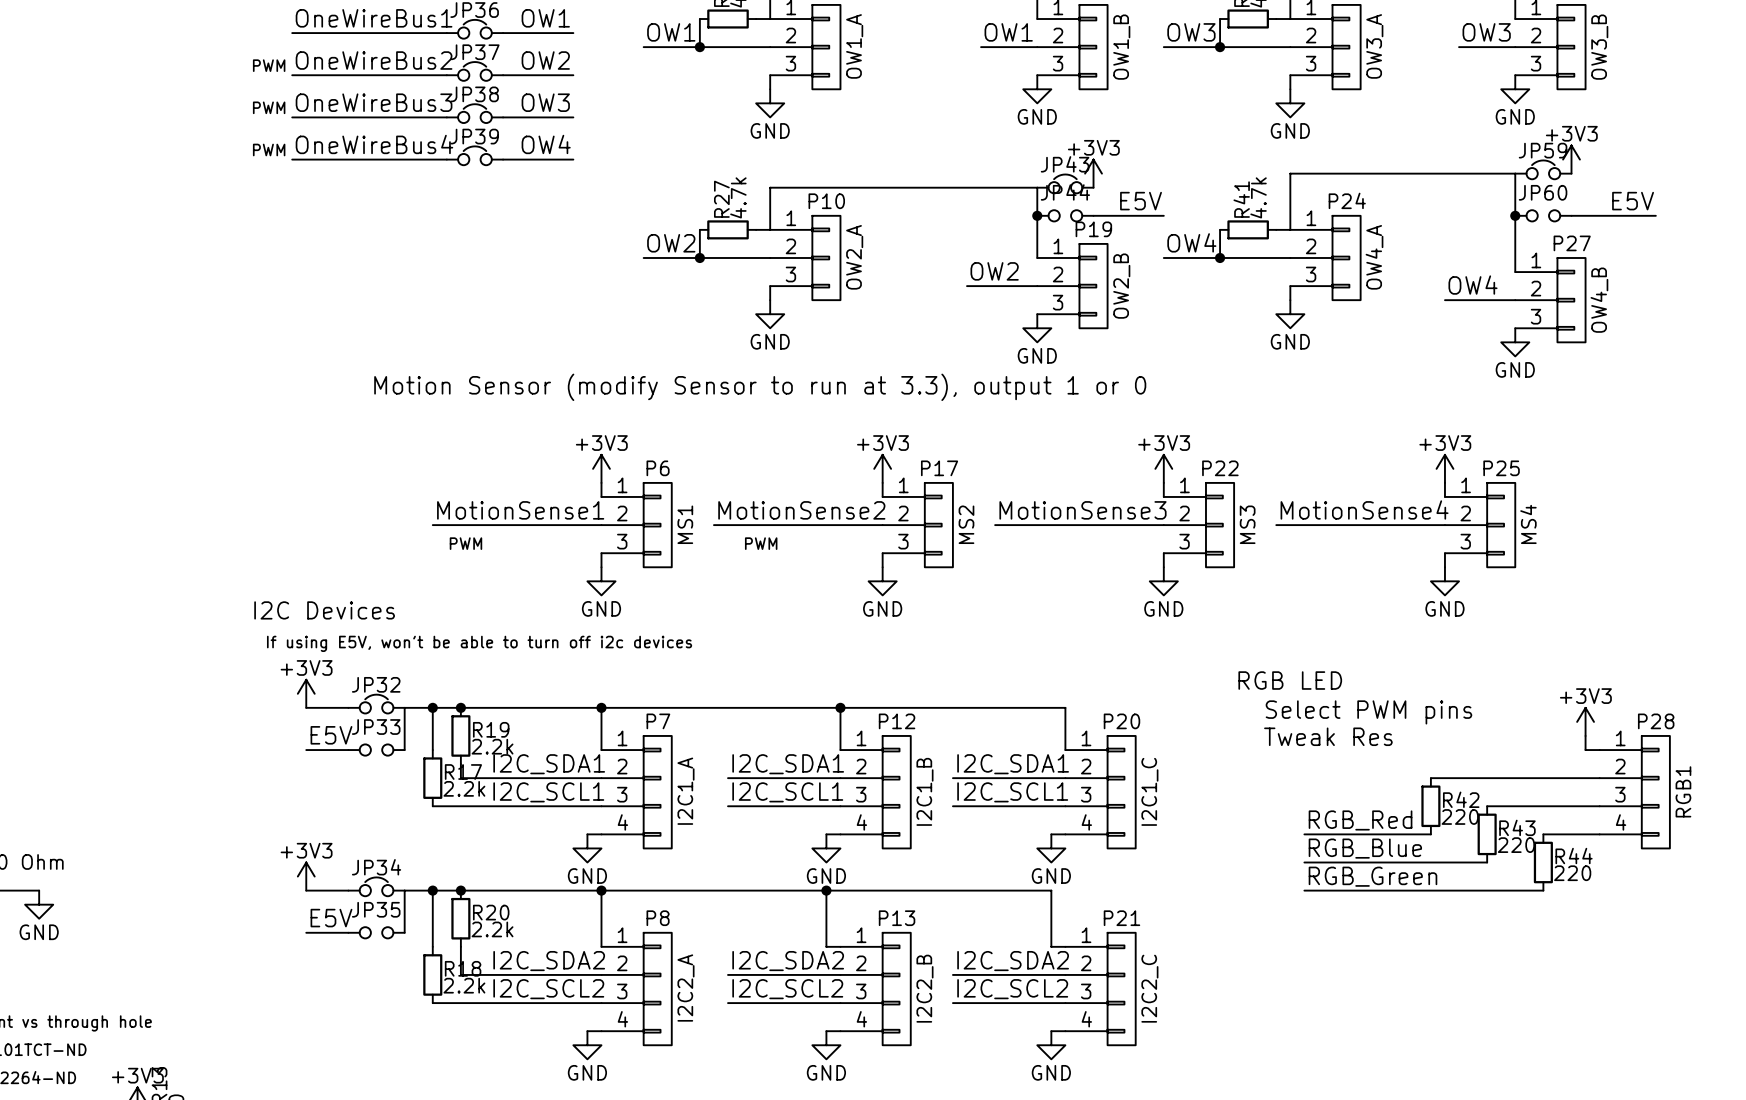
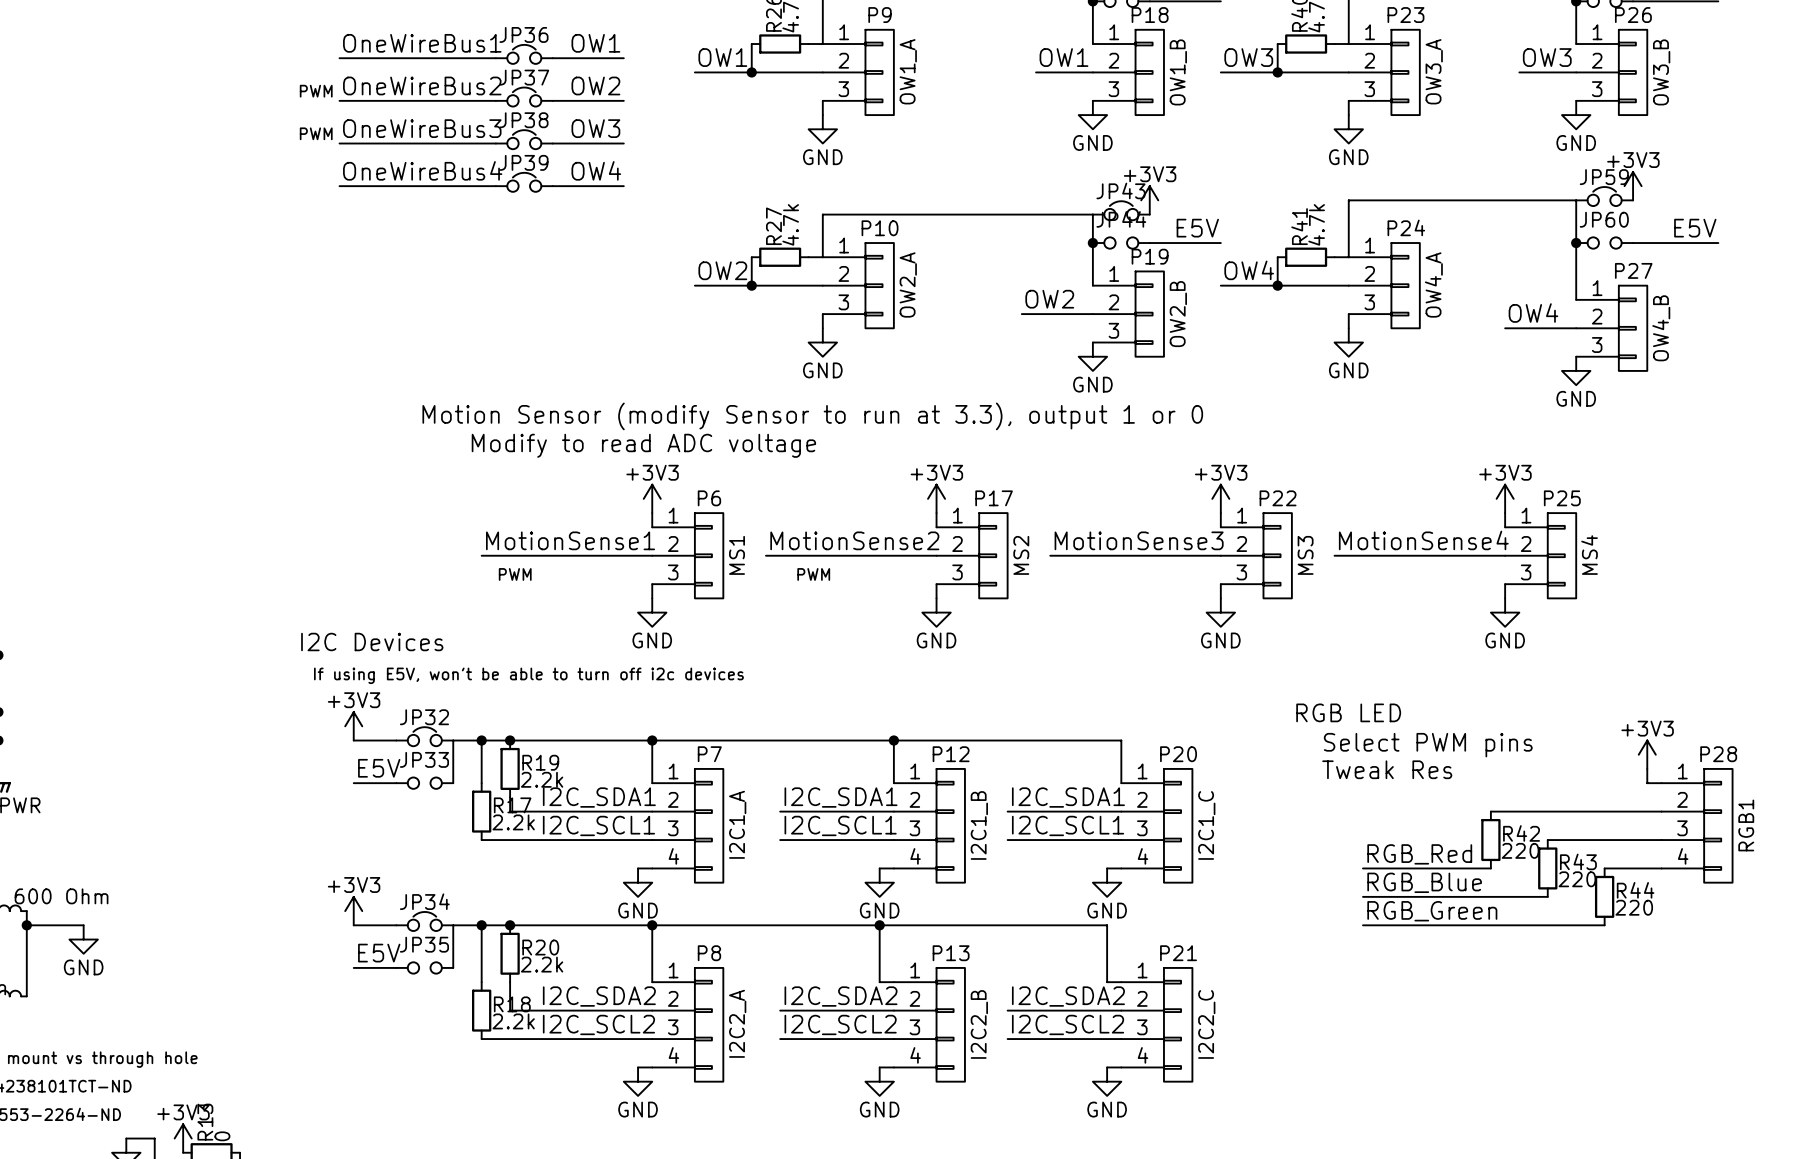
text: PWM (269, 149) -> none
text: none -> Modify to read ADC voltage (643, 445)

